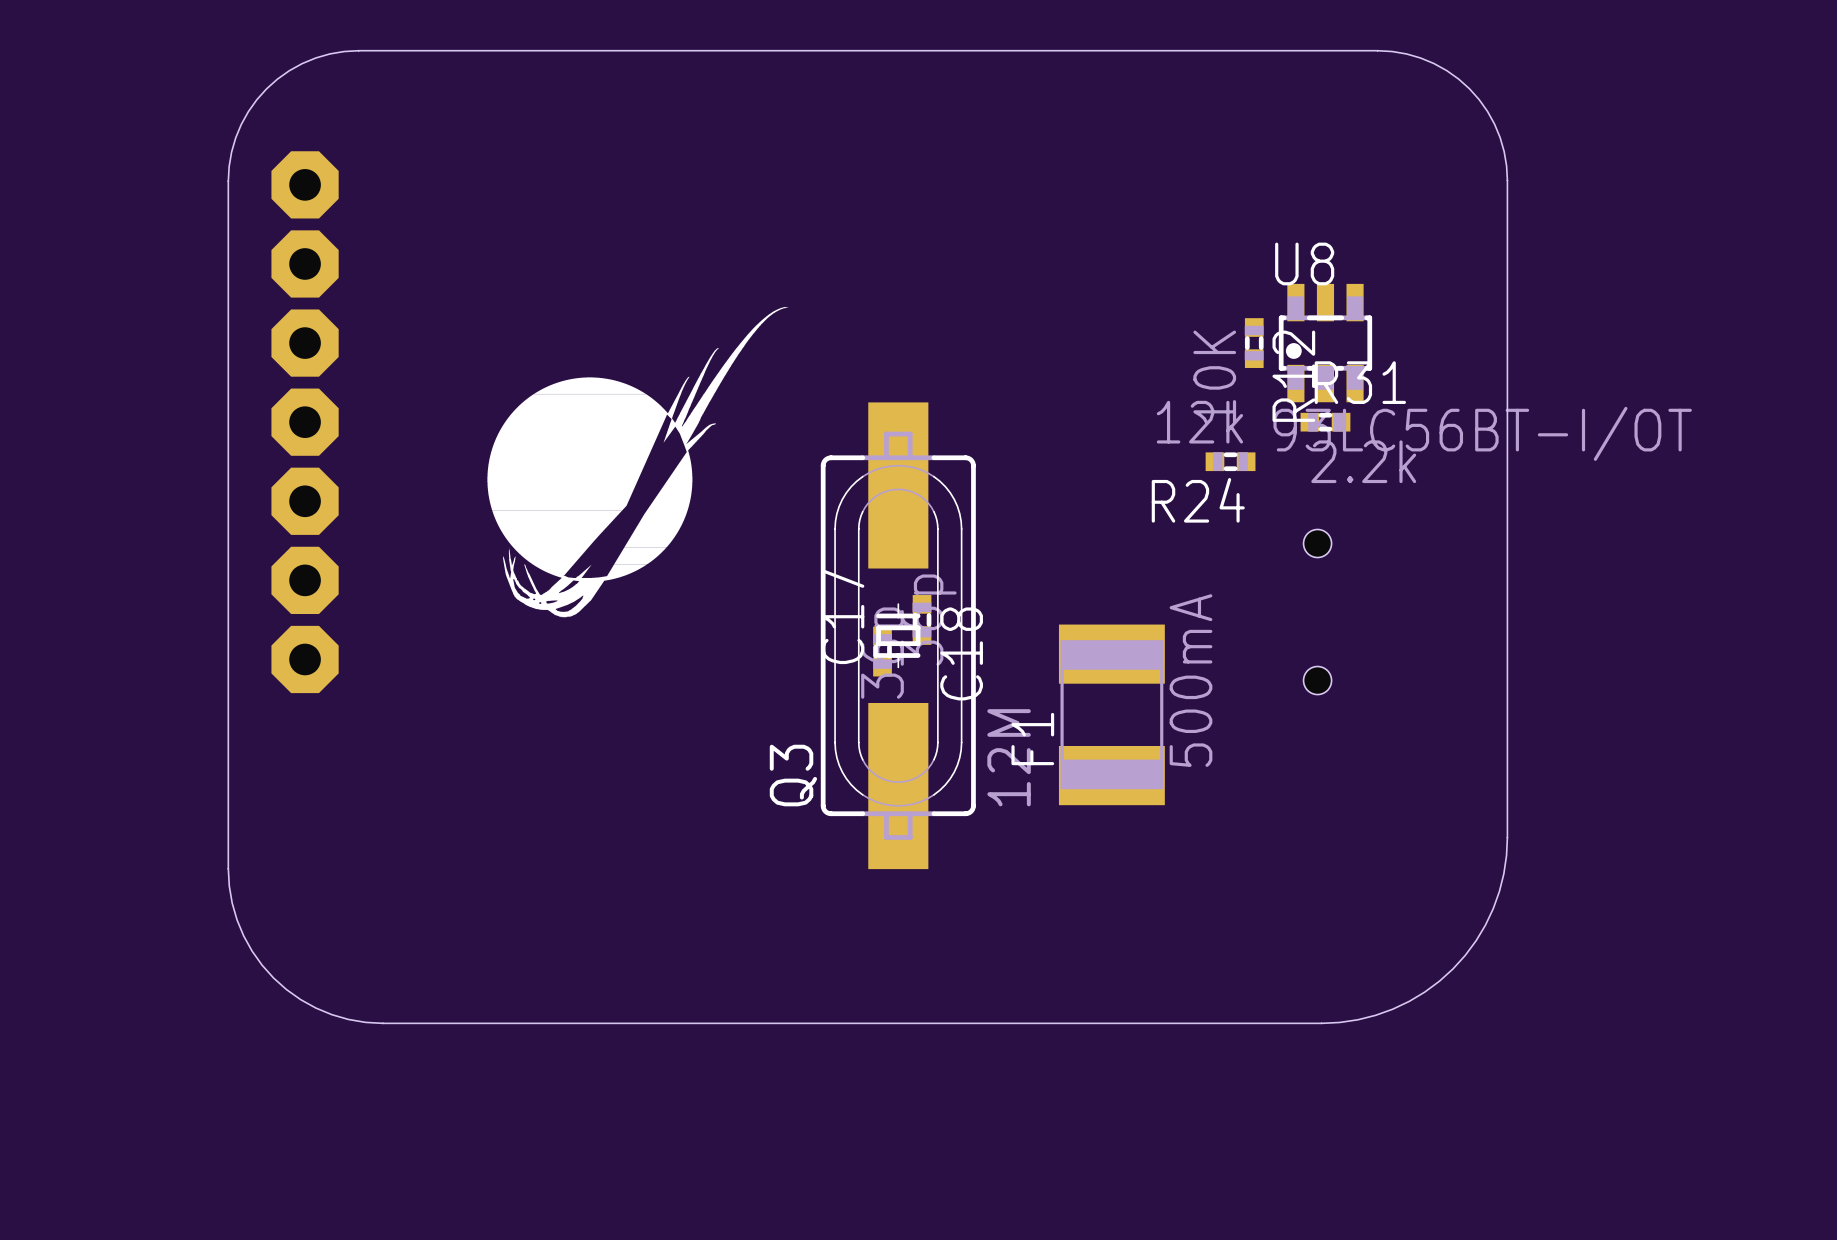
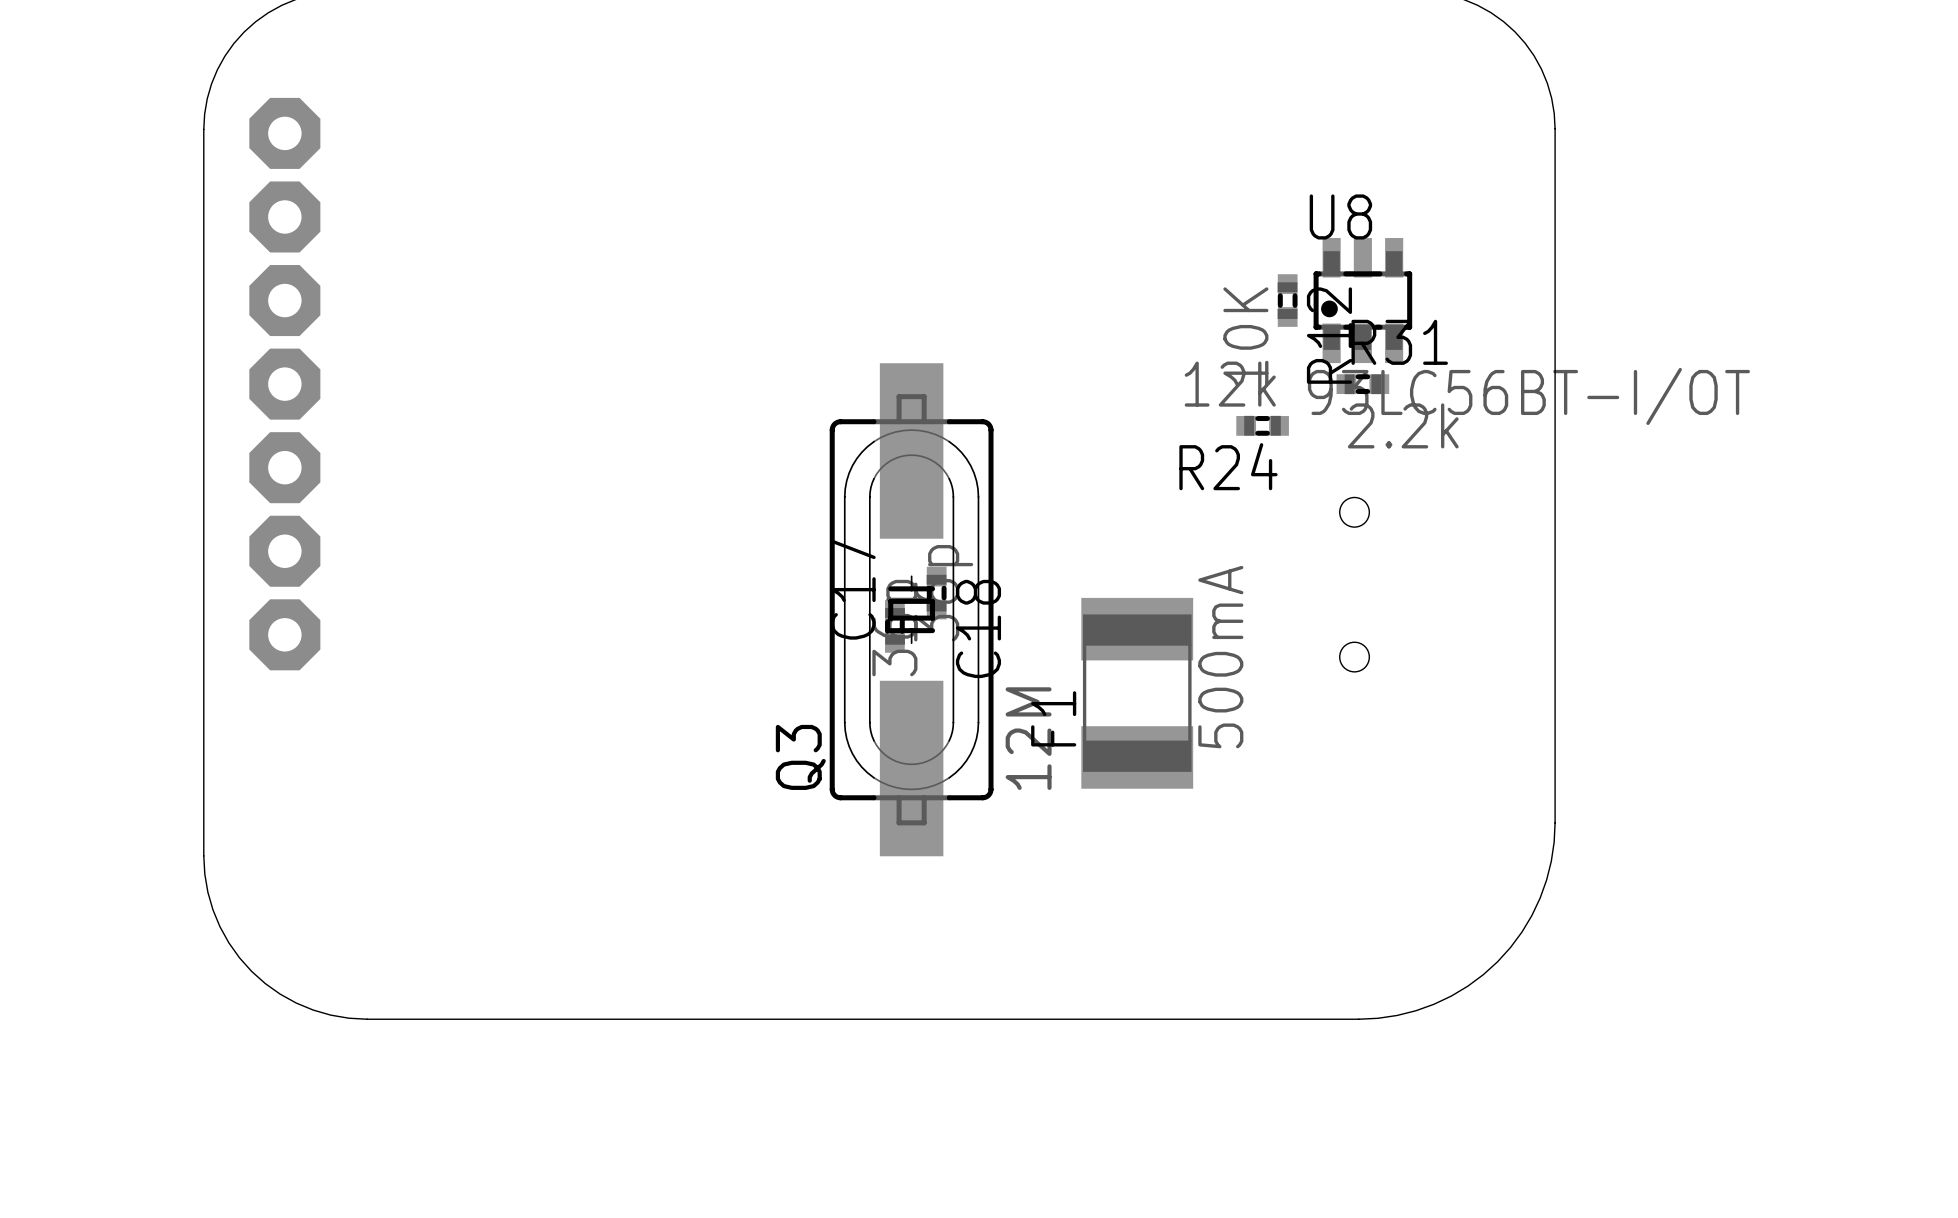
drawing: [487, 307, 789, 618] -> none

